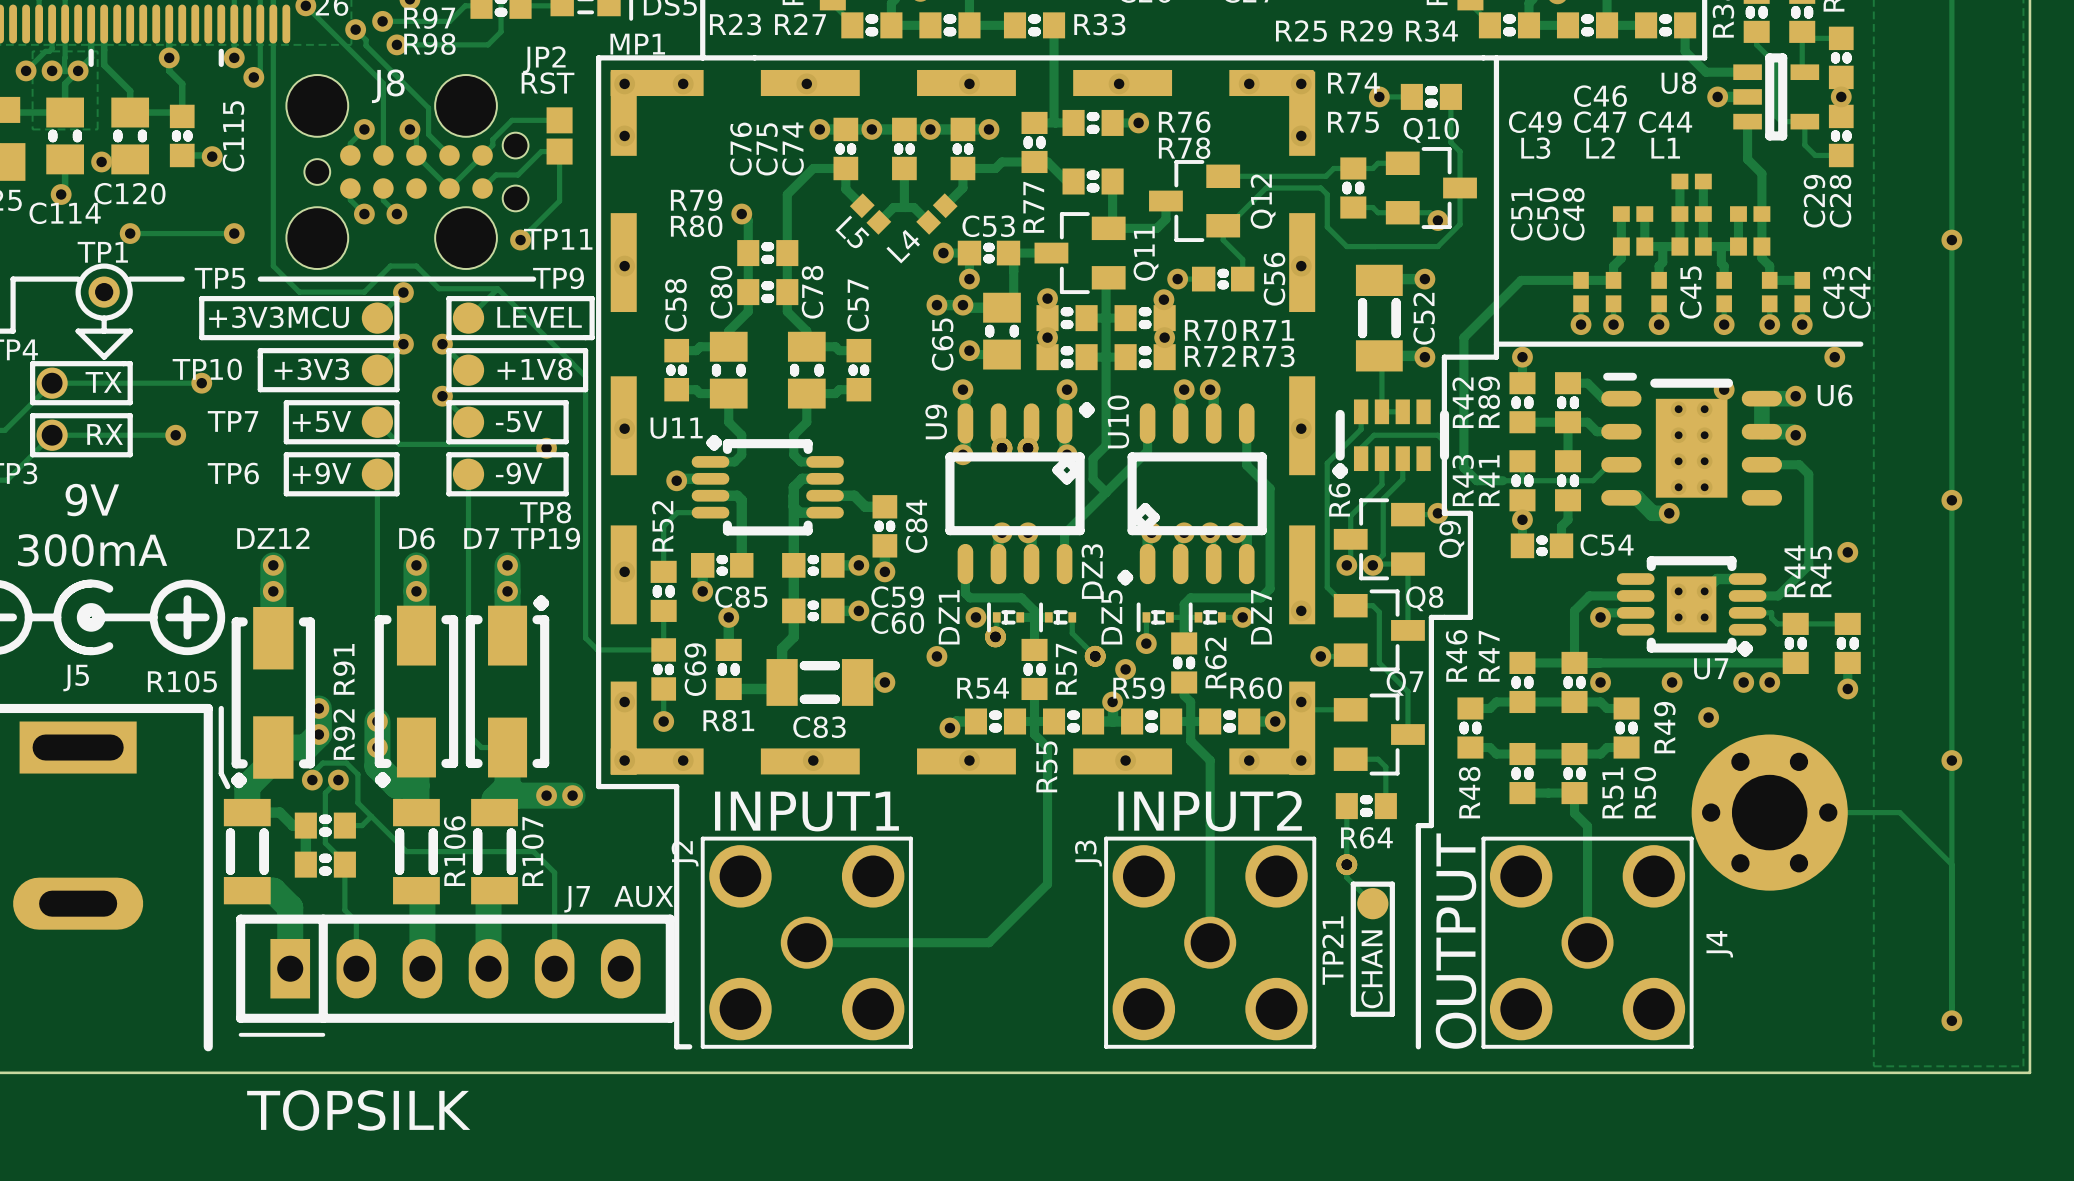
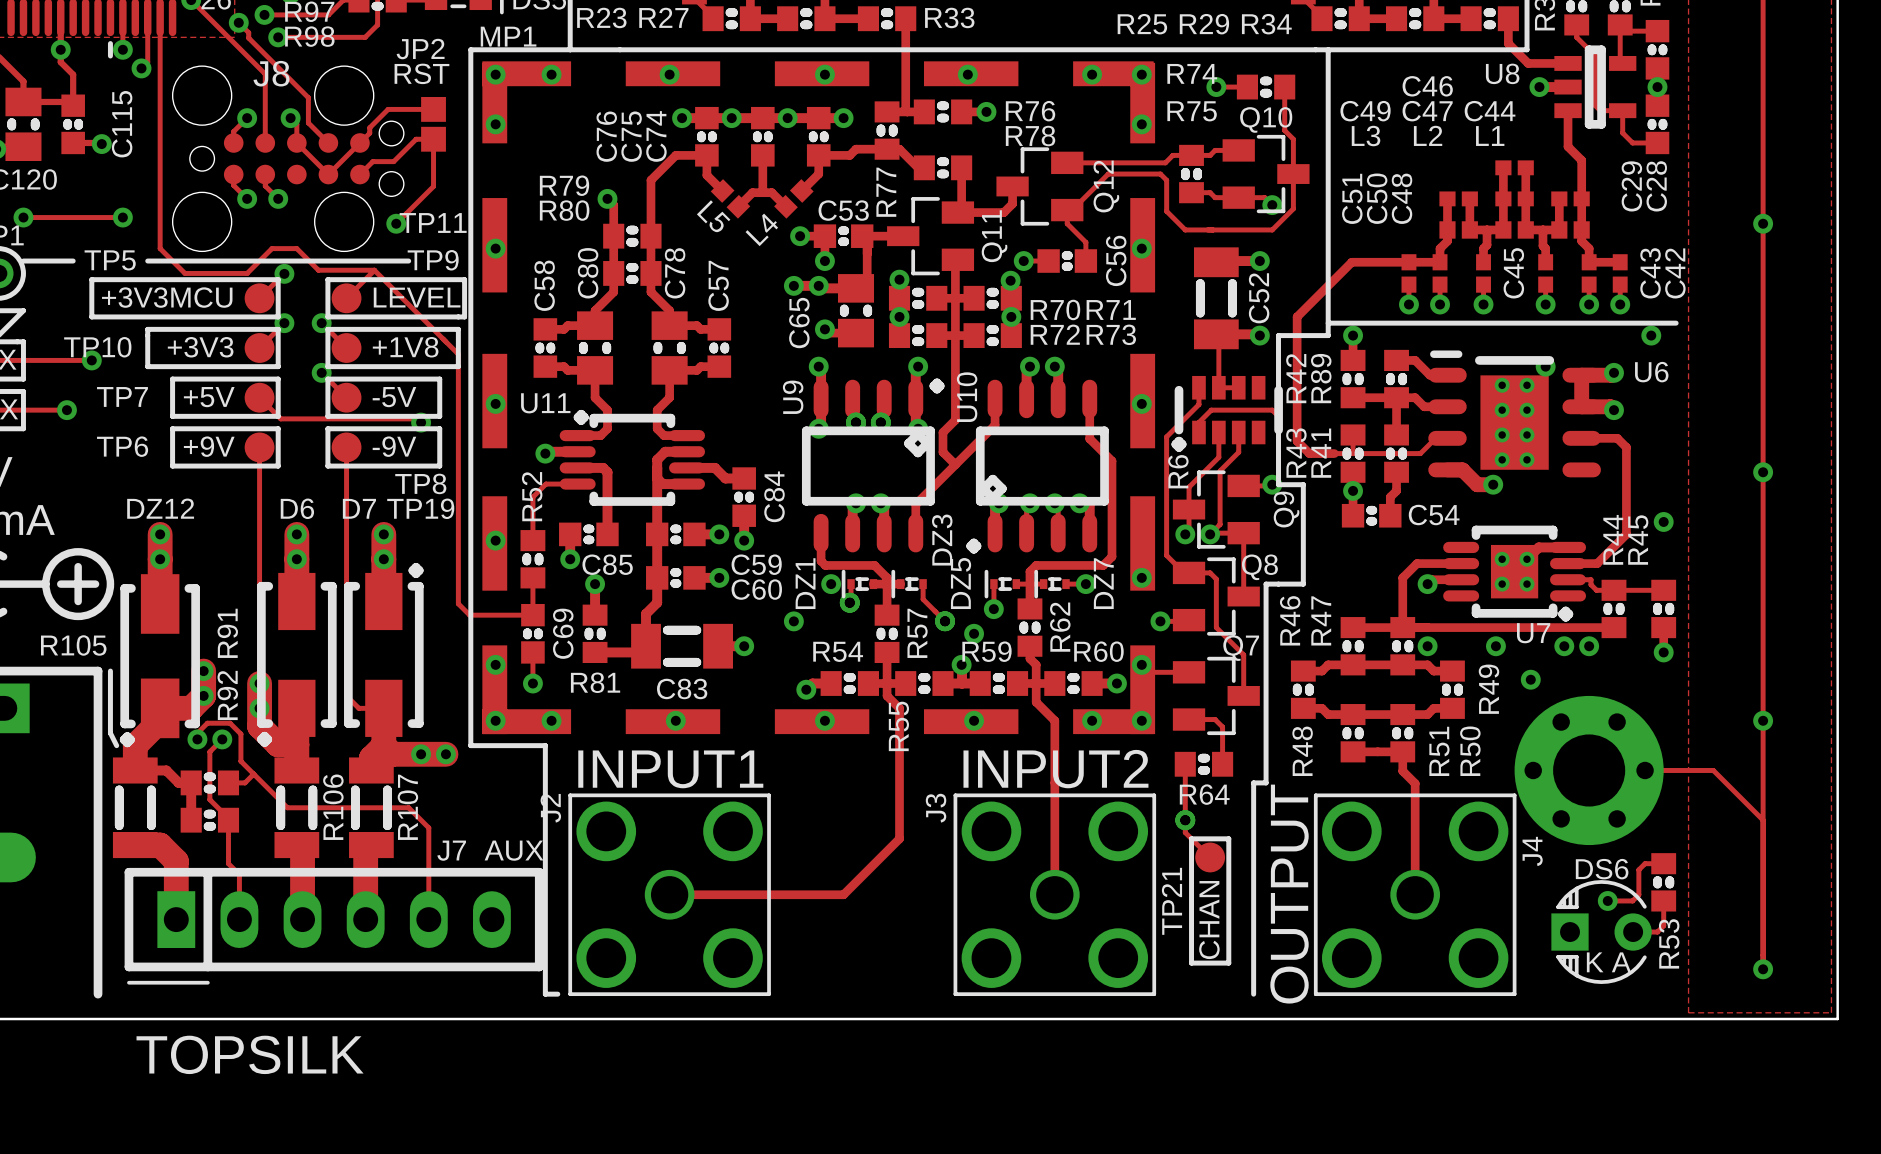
track: none -> (1663, 863) (1645, 863) (1638, 869) (1638, 894) (1632, 900) (1607, 900)
R53: none -> (1663, 882)
J4 name position: J4 (1719, 944) -> J4 (1532, 851)
via: none -> (1607, 900)
track: none -> (1663, 900) (1663, 925) (1657, 932) (1633, 932)
DS6: none -> (1601, 932)
text: none -> K A (1608, 962)

